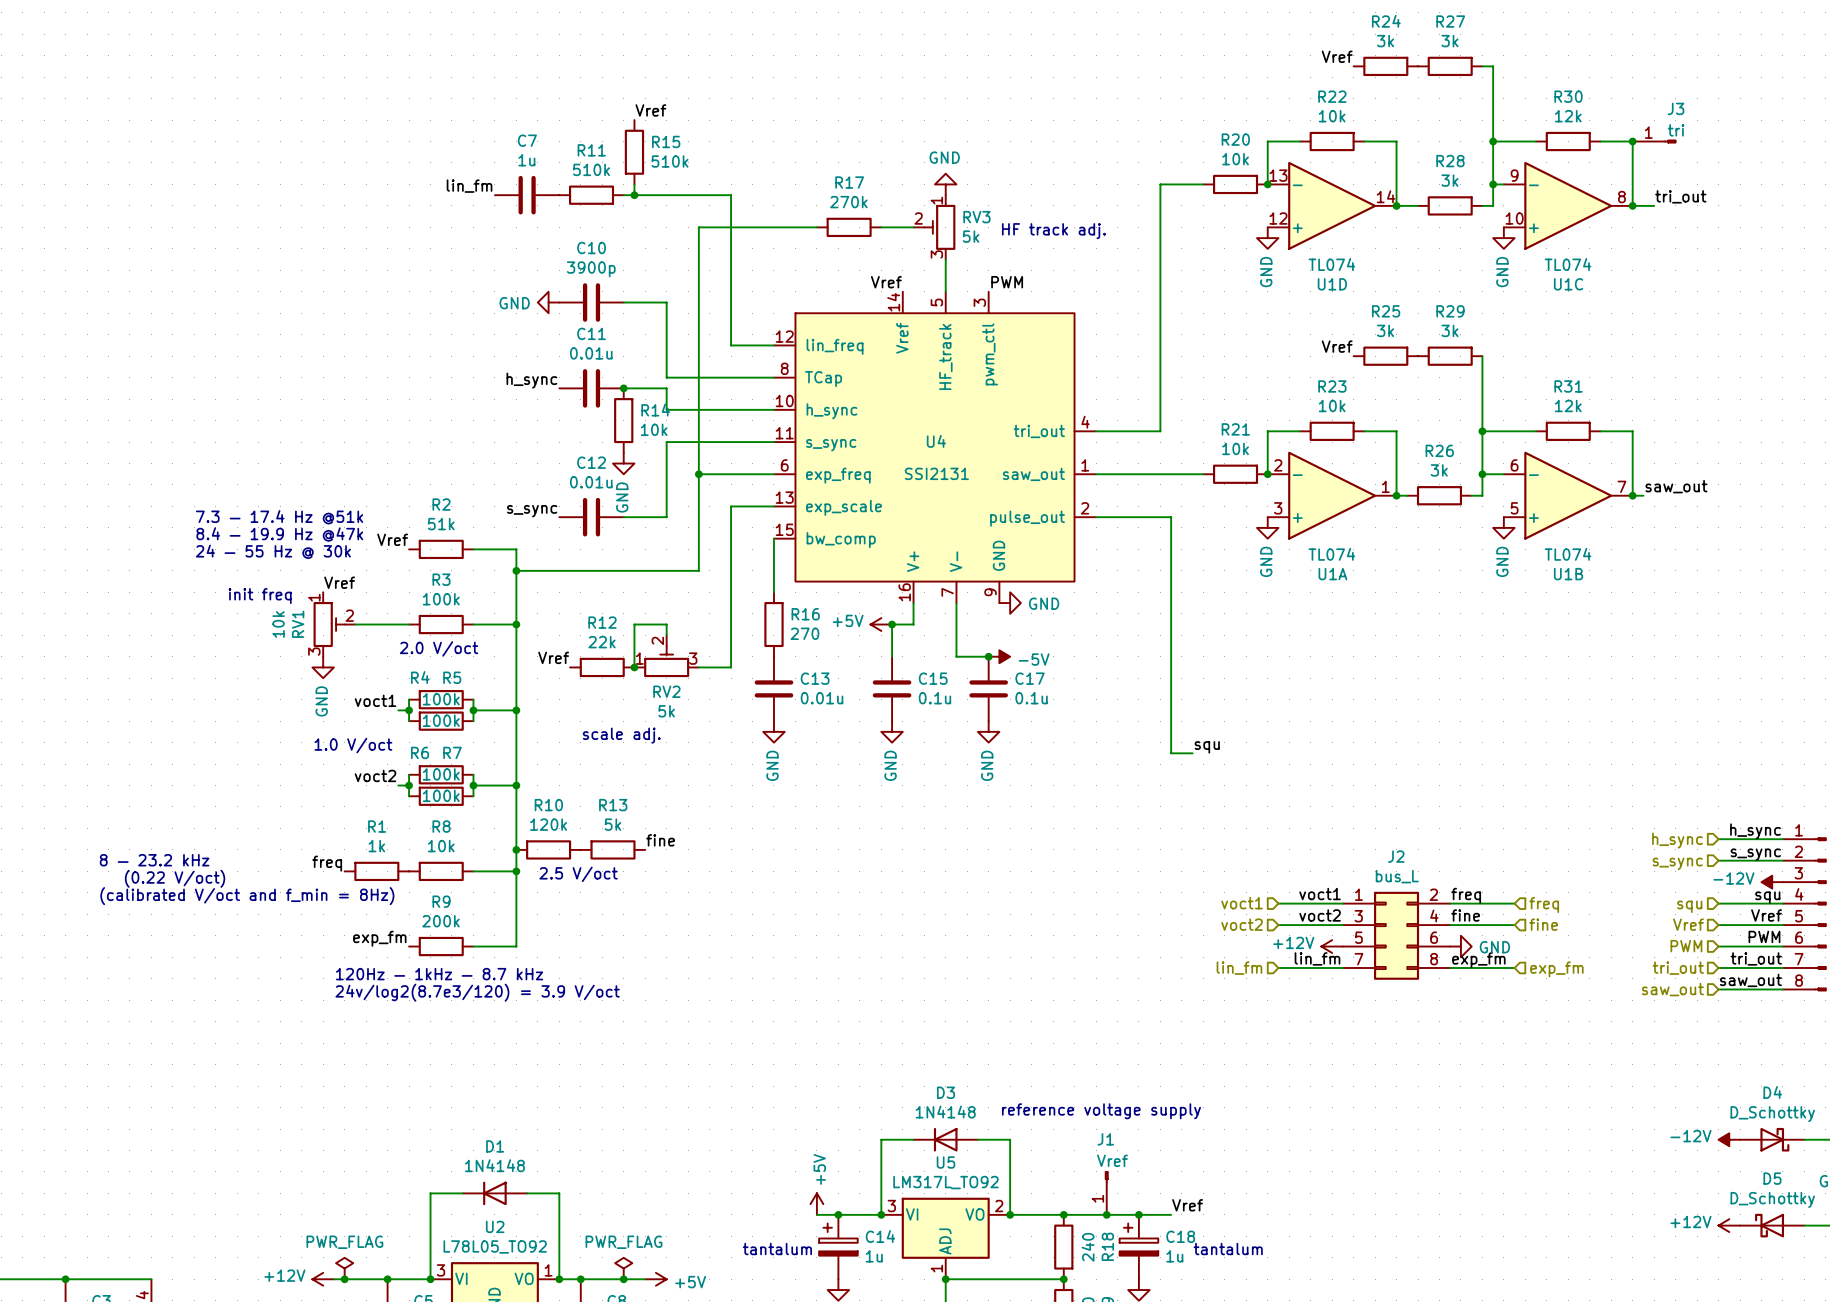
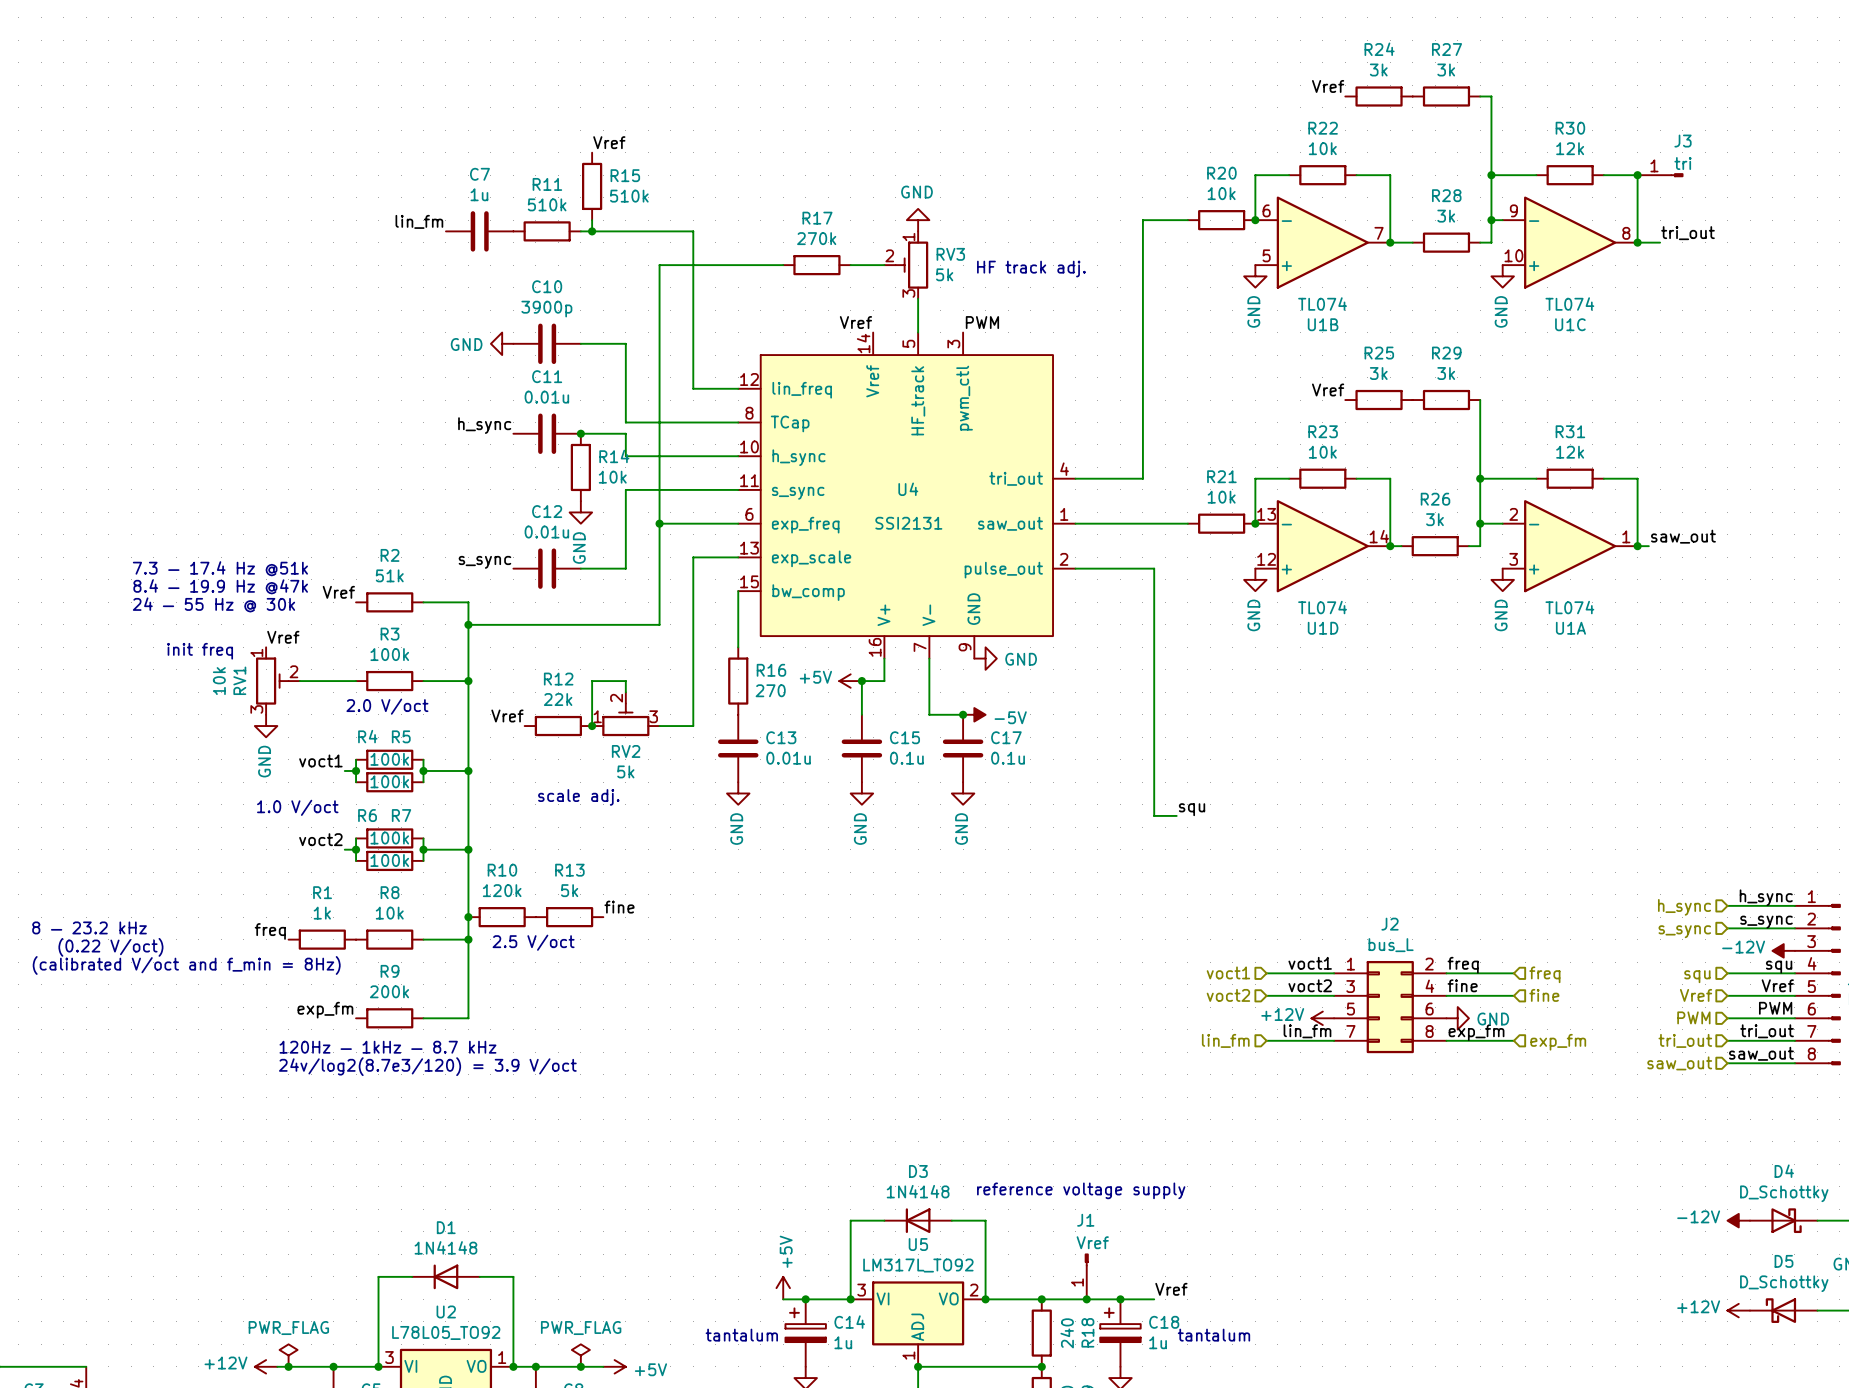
U1D position: (1332, 205) -> (1322, 546)
U1A position: (1332, 495) -> (1570, 546)
U1B position: (1568, 495) -> (1322, 242)

